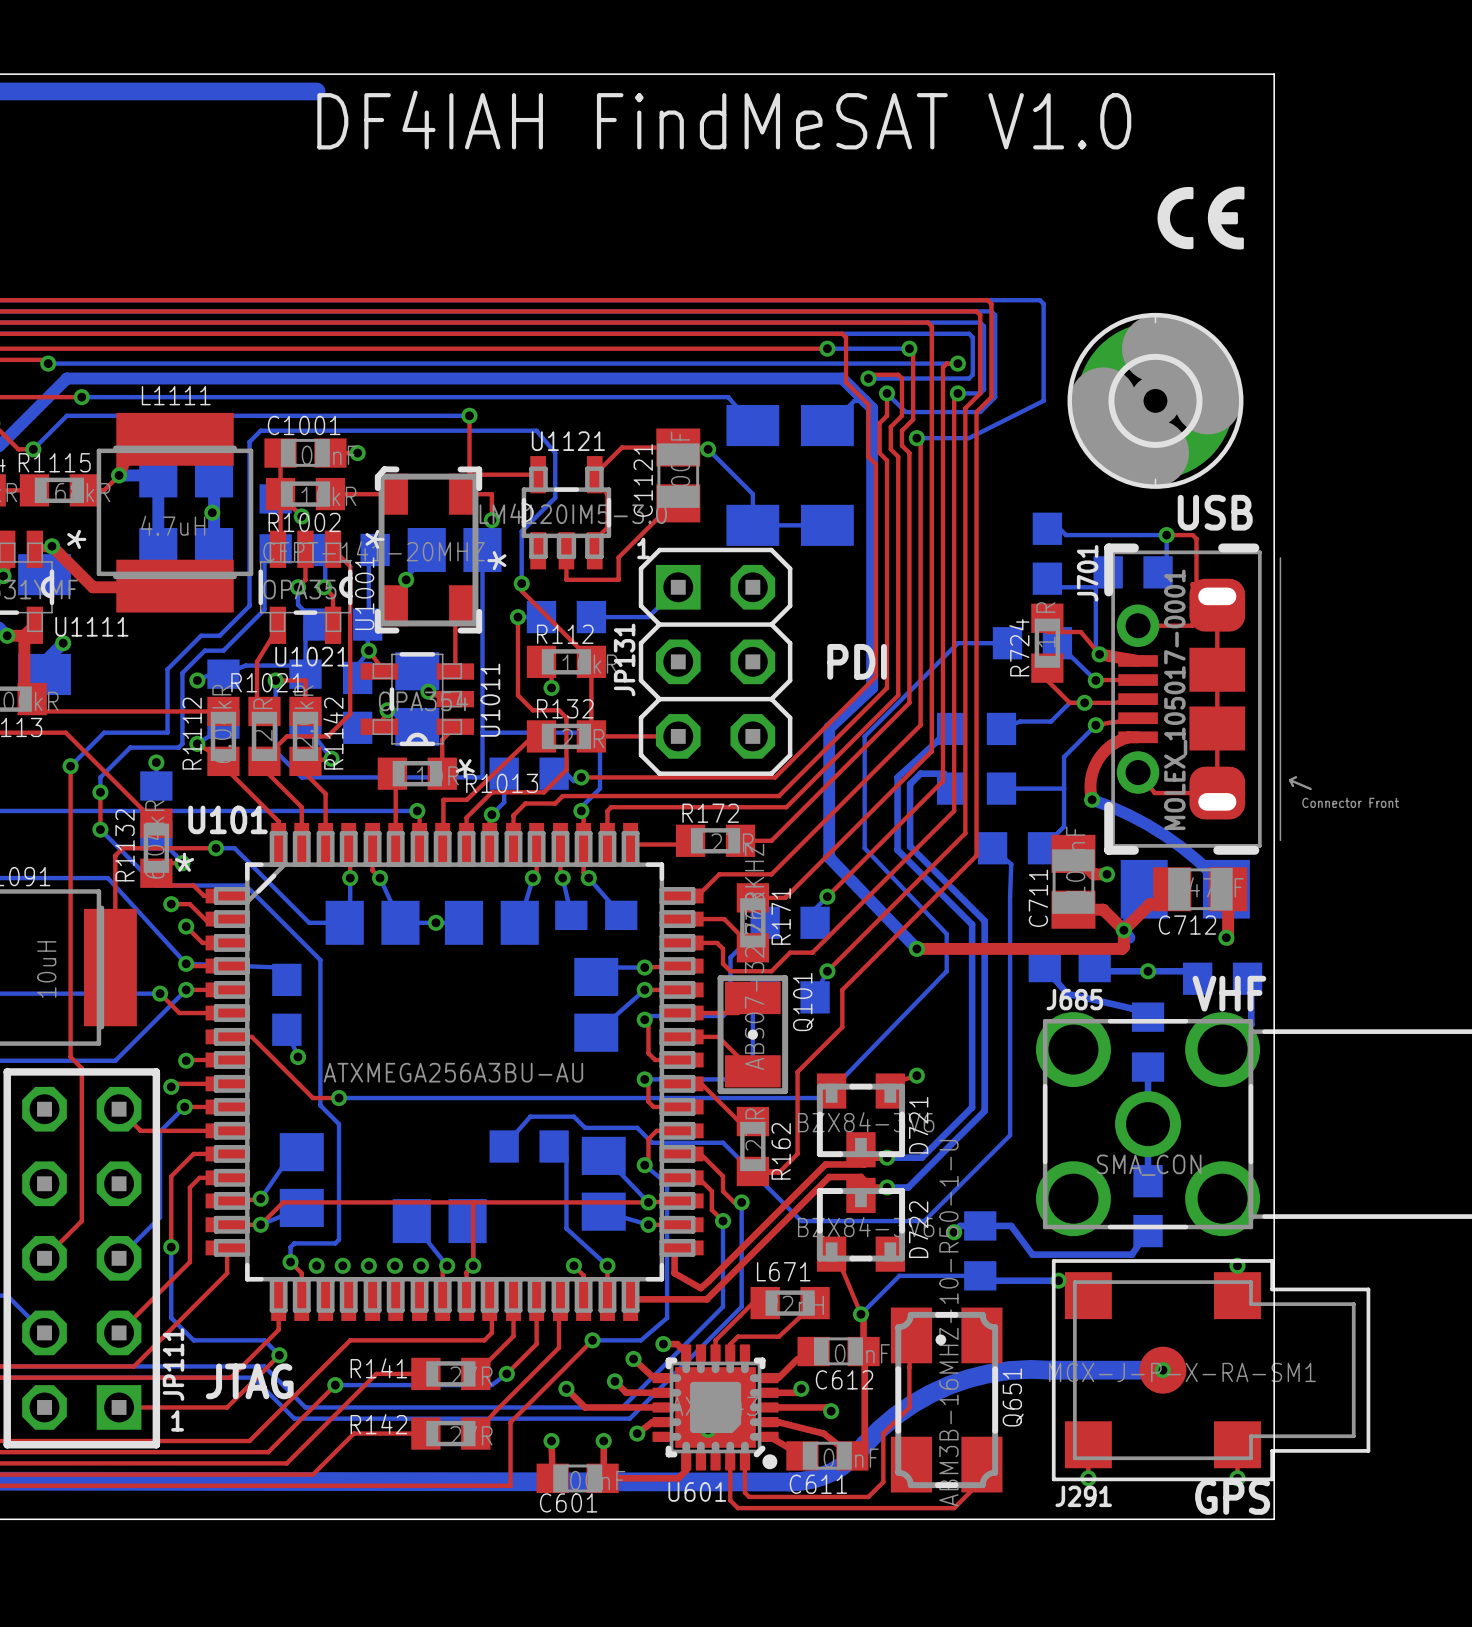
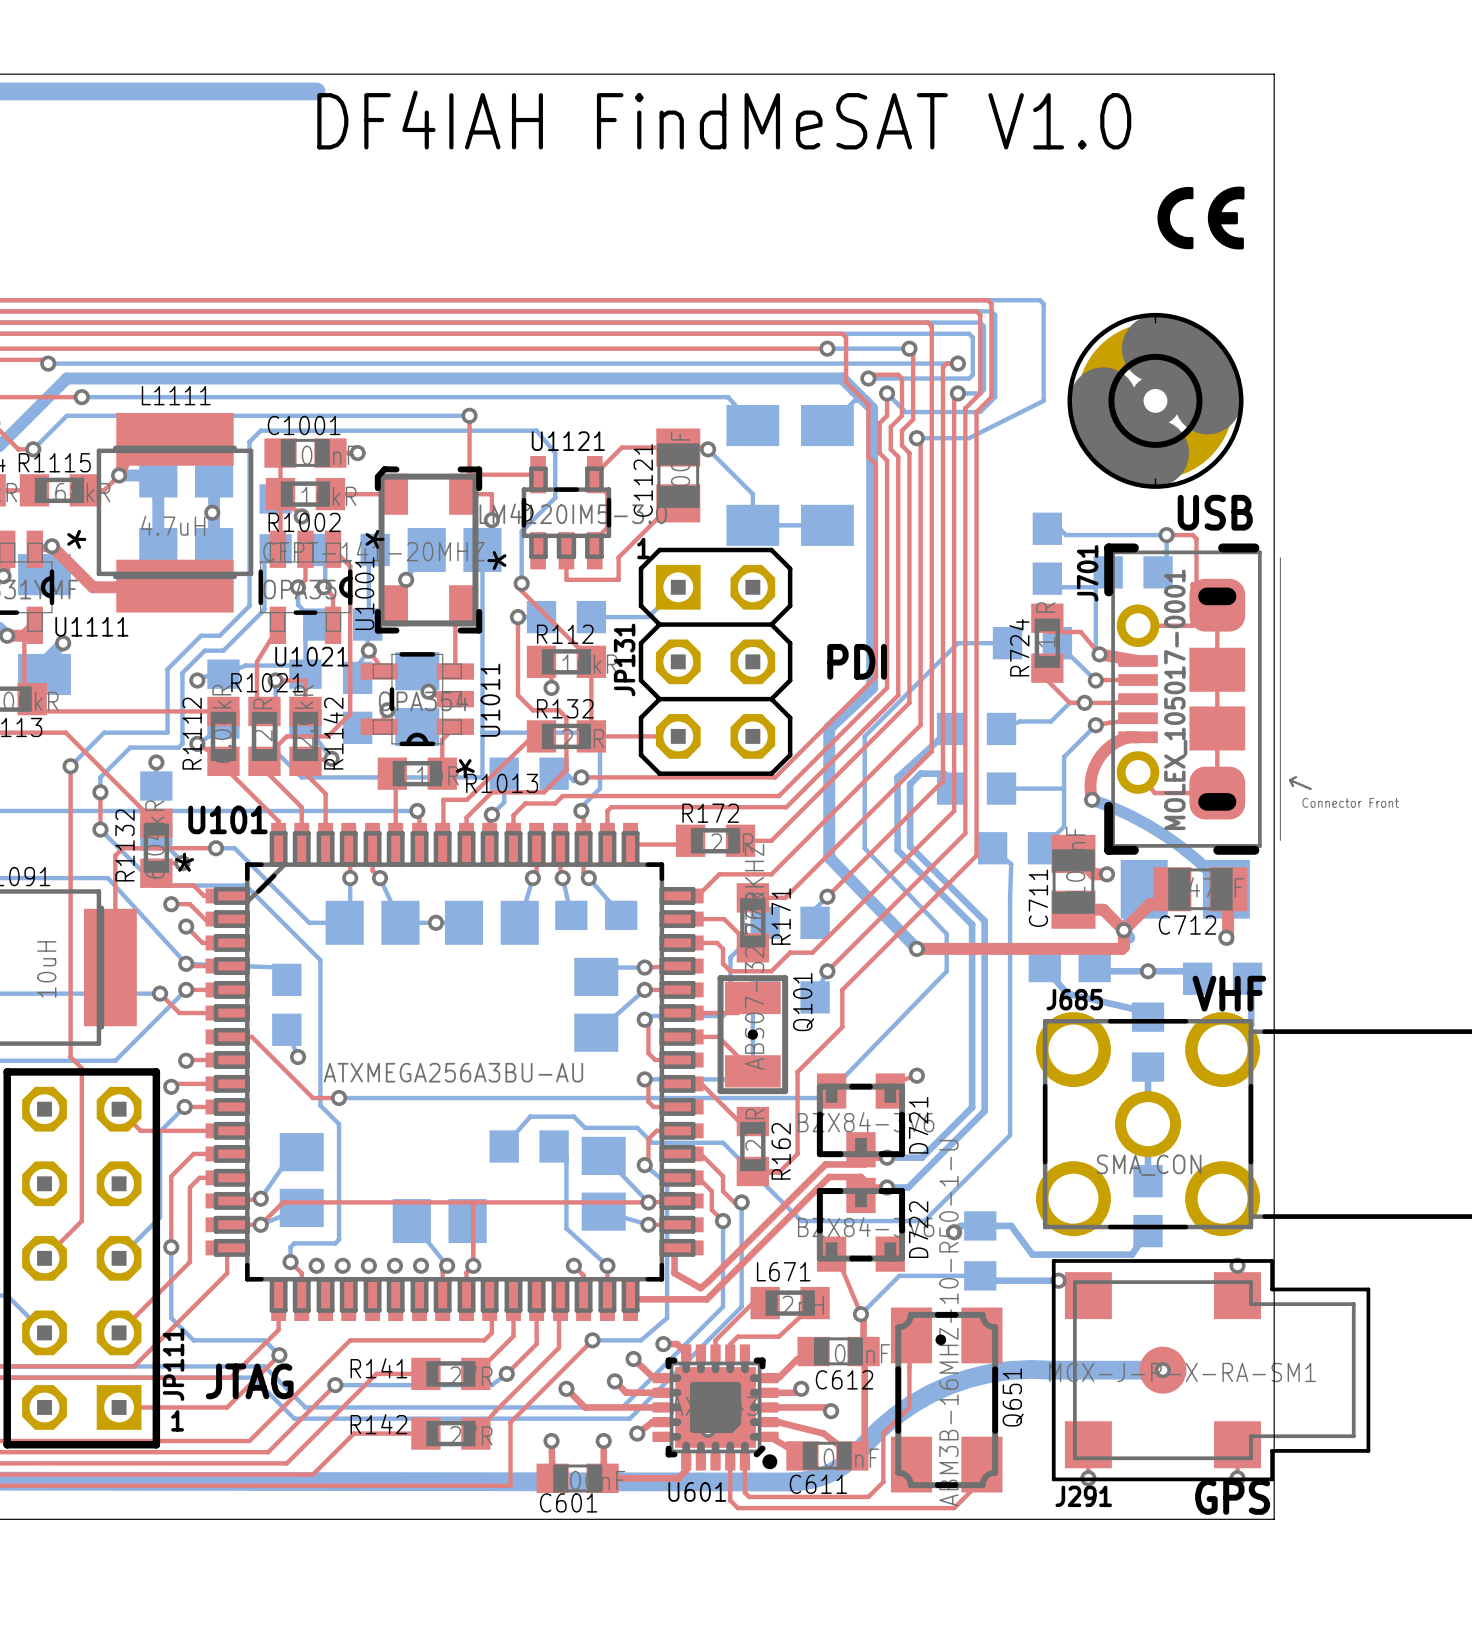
top track width: thick (24, 635) (24, 691) -> thin (24, 635) (24, 691)

